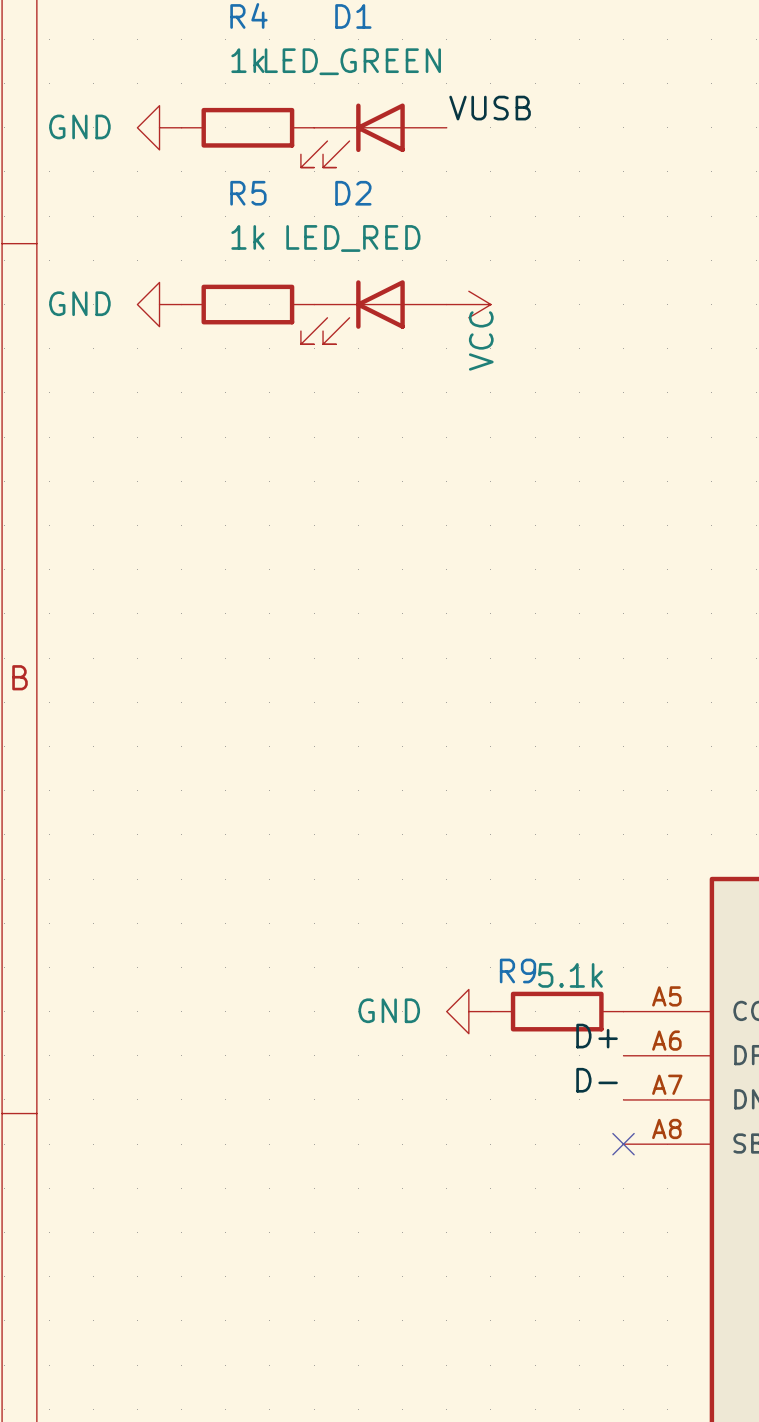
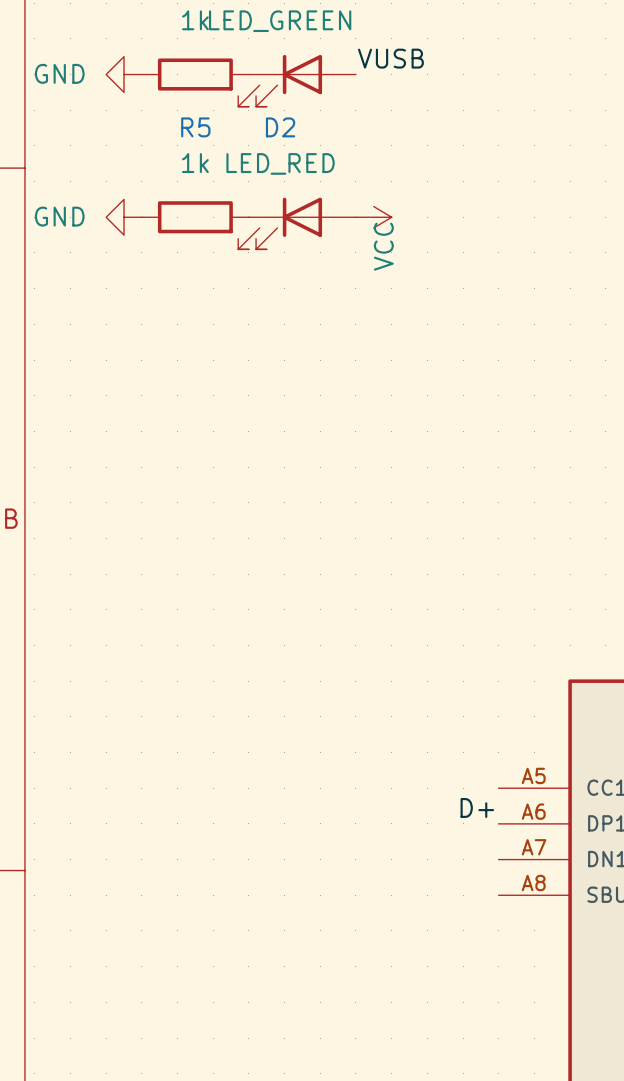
power symbol: GND (468, 1011) -> none
R9: 5.1k (557, 1011) -> none
label: D- (597, 1080) -> none
no-connect mark: (623, 1144) -> none

